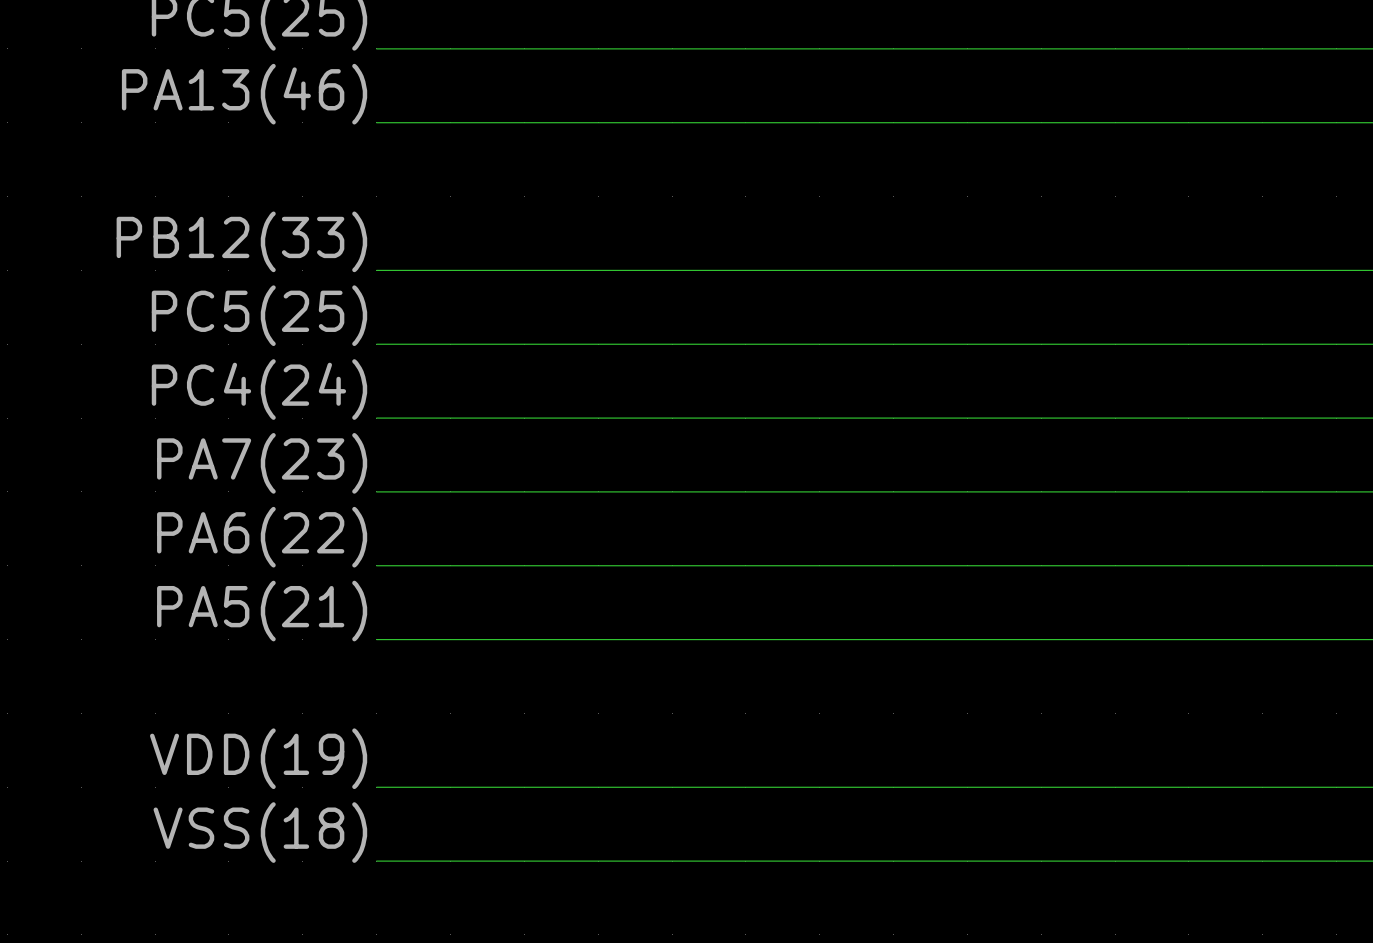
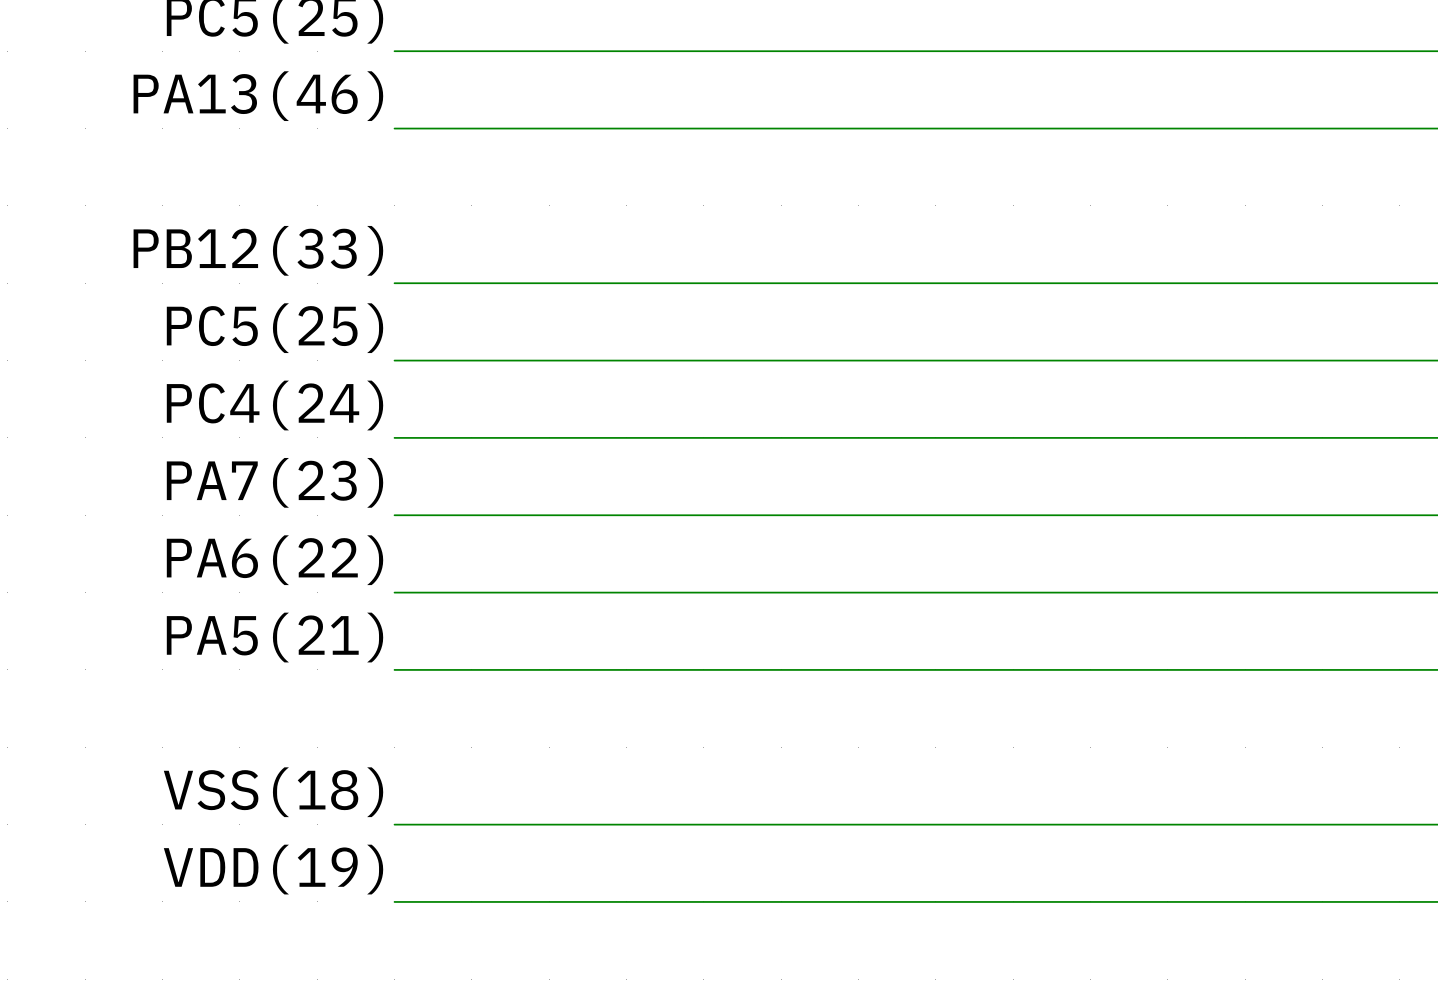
label: VDD(19) (258, 758) -> VSS(18) (273, 792)
label: VSS(18) (260, 832) -> VDD(19) (273, 869)

